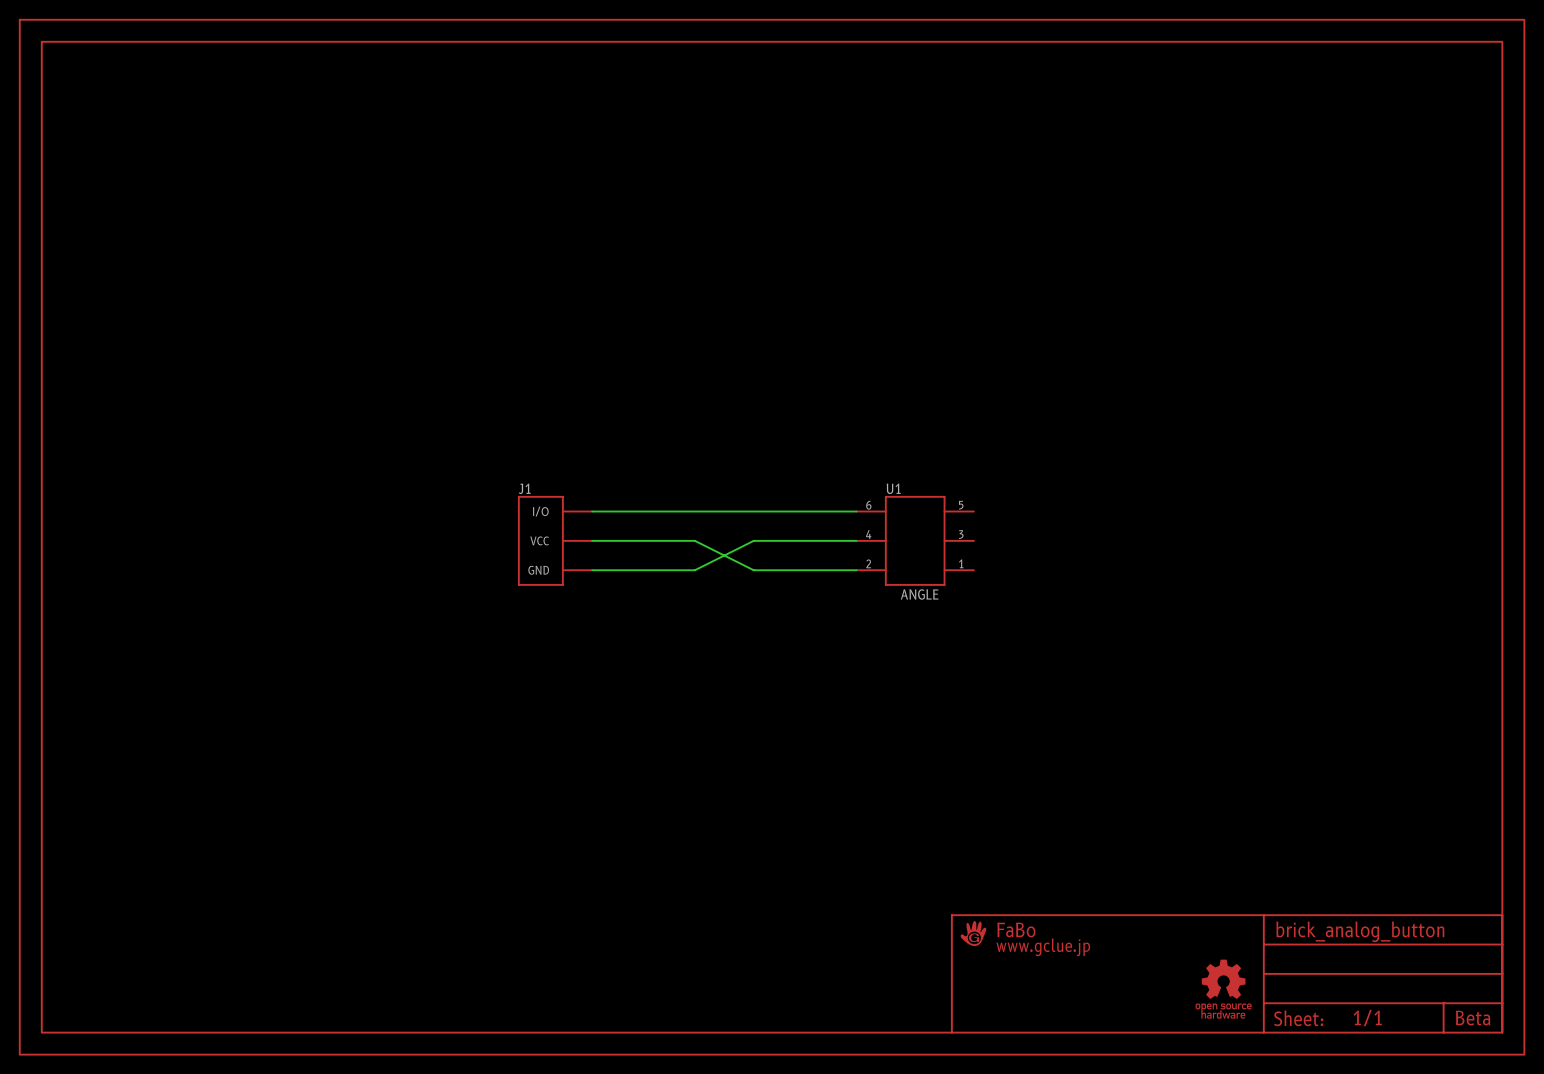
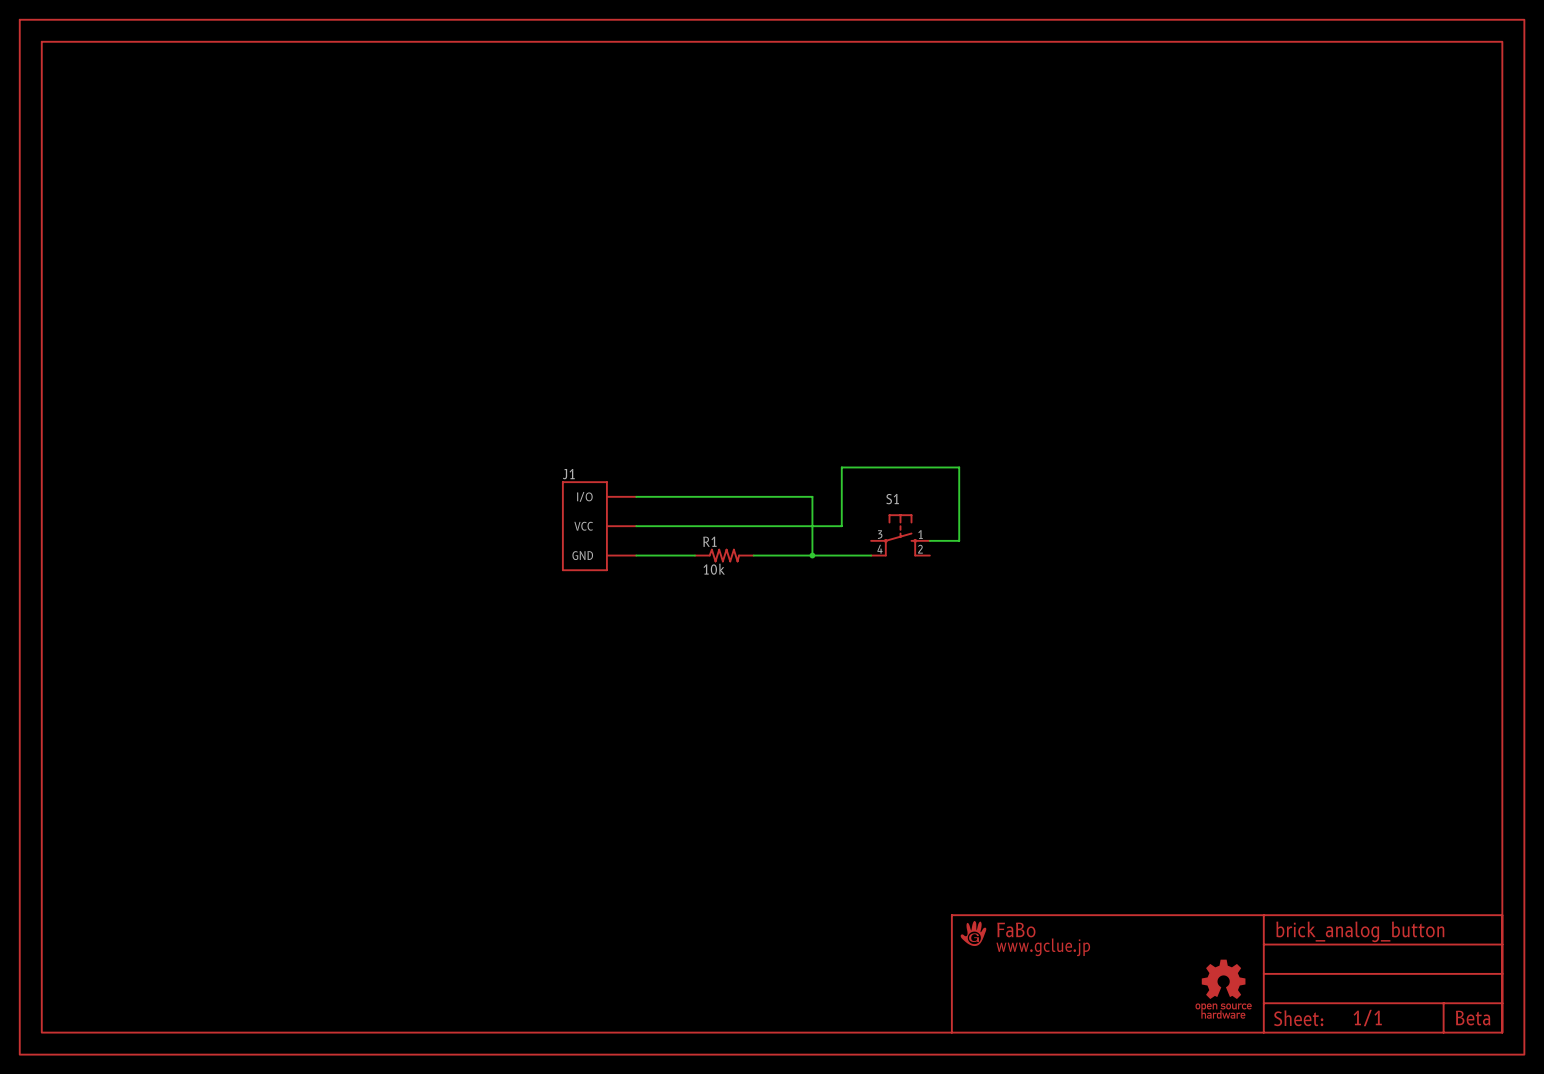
wire: none -> (636, 496) (812, 496) (812, 555)
wire: (592, 511) (856, 511) -> none
wire: none -> (636, 526) (841, 526) (841, 467) (959, 467) (959, 540) (929, 540)
S1: none -> (900, 535)
J1 position: (555, 540) -> (599, 526)
wire: (592, 540) (694, 540) (753, 570) (856, 570) -> none
wire: (856, 540) (753, 540) (694, 570) (592, 570) -> none
U1: ANGLE (915, 540) -> none
wire: none -> (636, 555) (694, 555)
R1: none -> 10k (724, 555)
wire: none -> (753, 555) (871, 555)
junction: none -> (812, 555)

